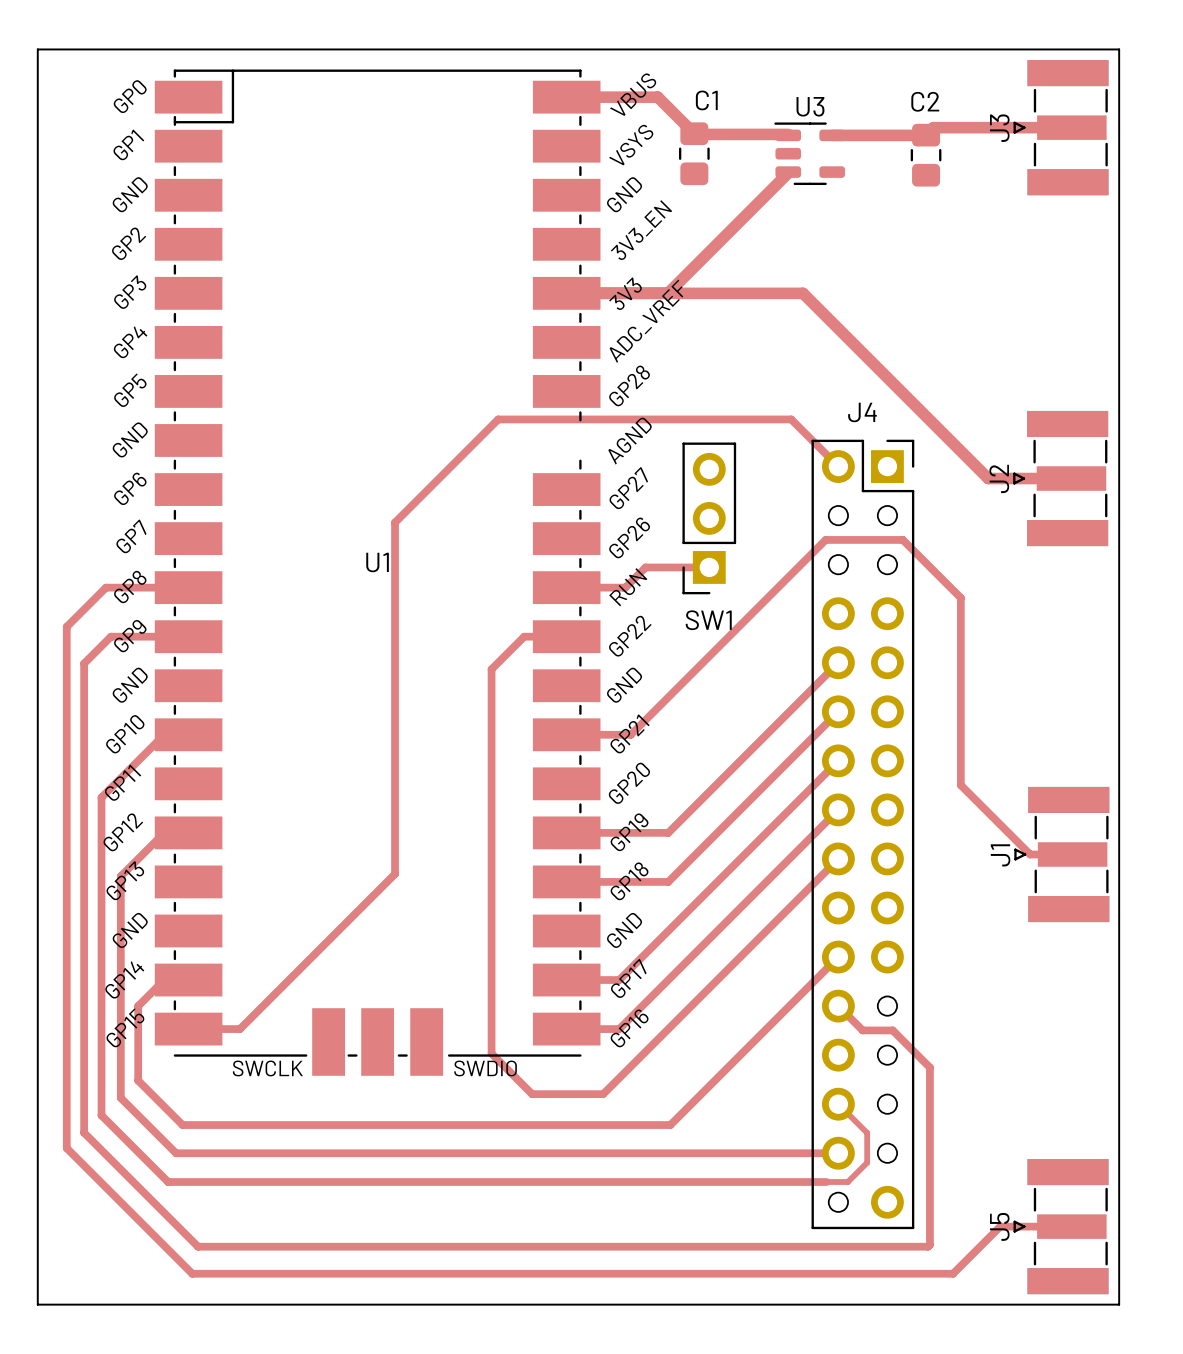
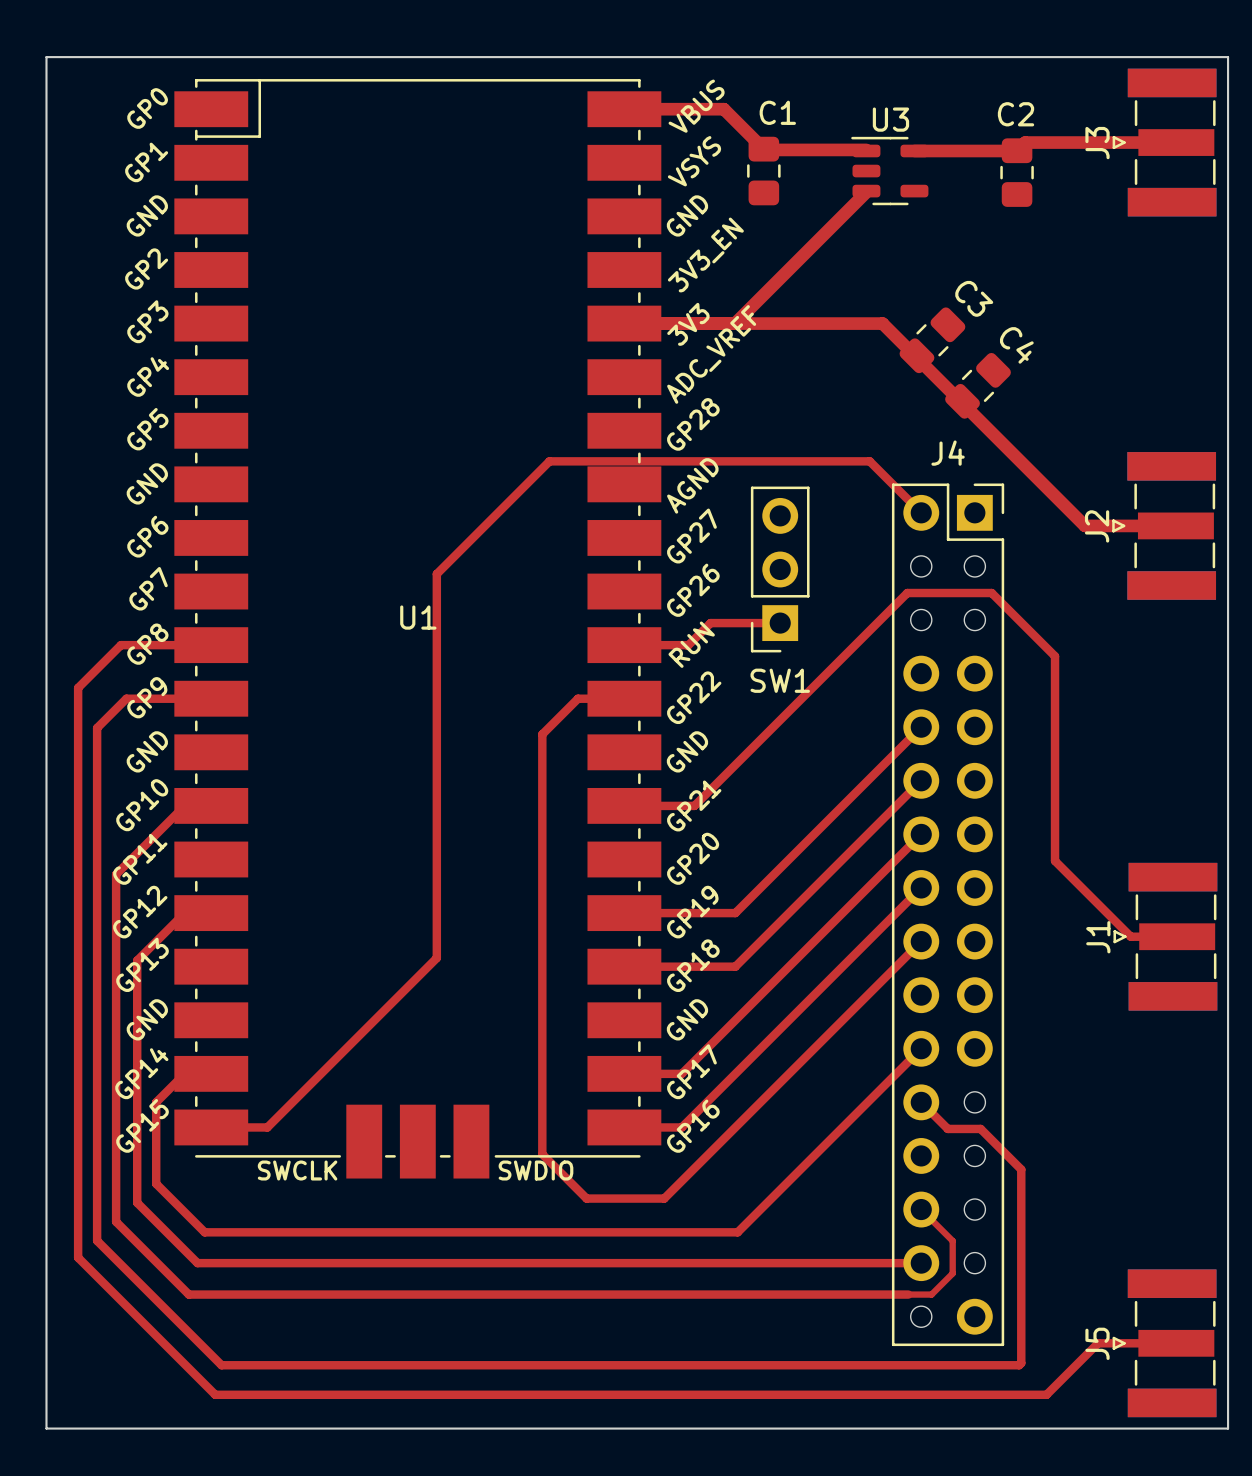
U1 footprint: [154, 69, 601, 1076] -> [174, 79, 662, 1179]
C3: none -> (932, 340)
C4: none -> (978, 385)

